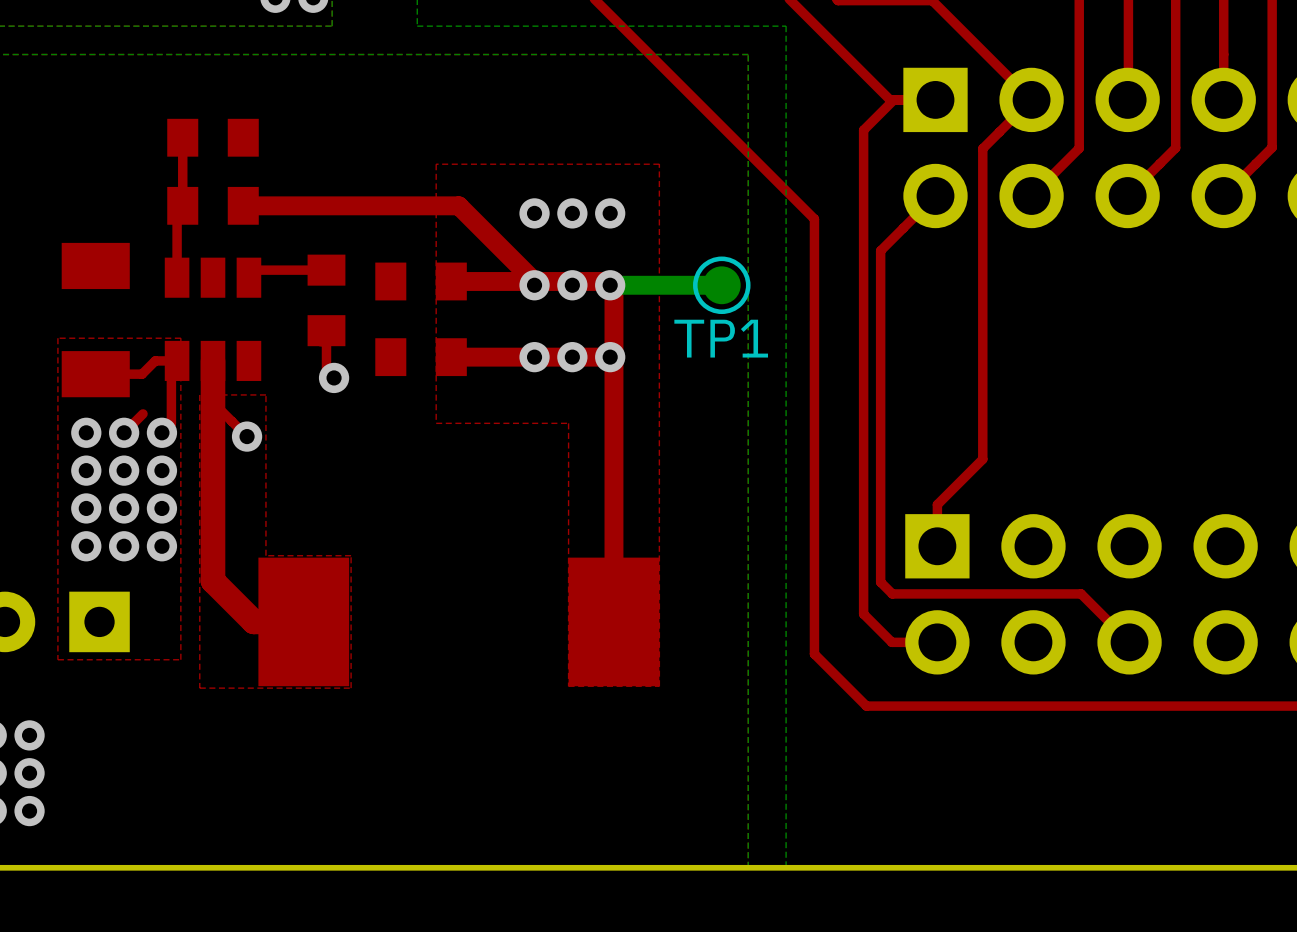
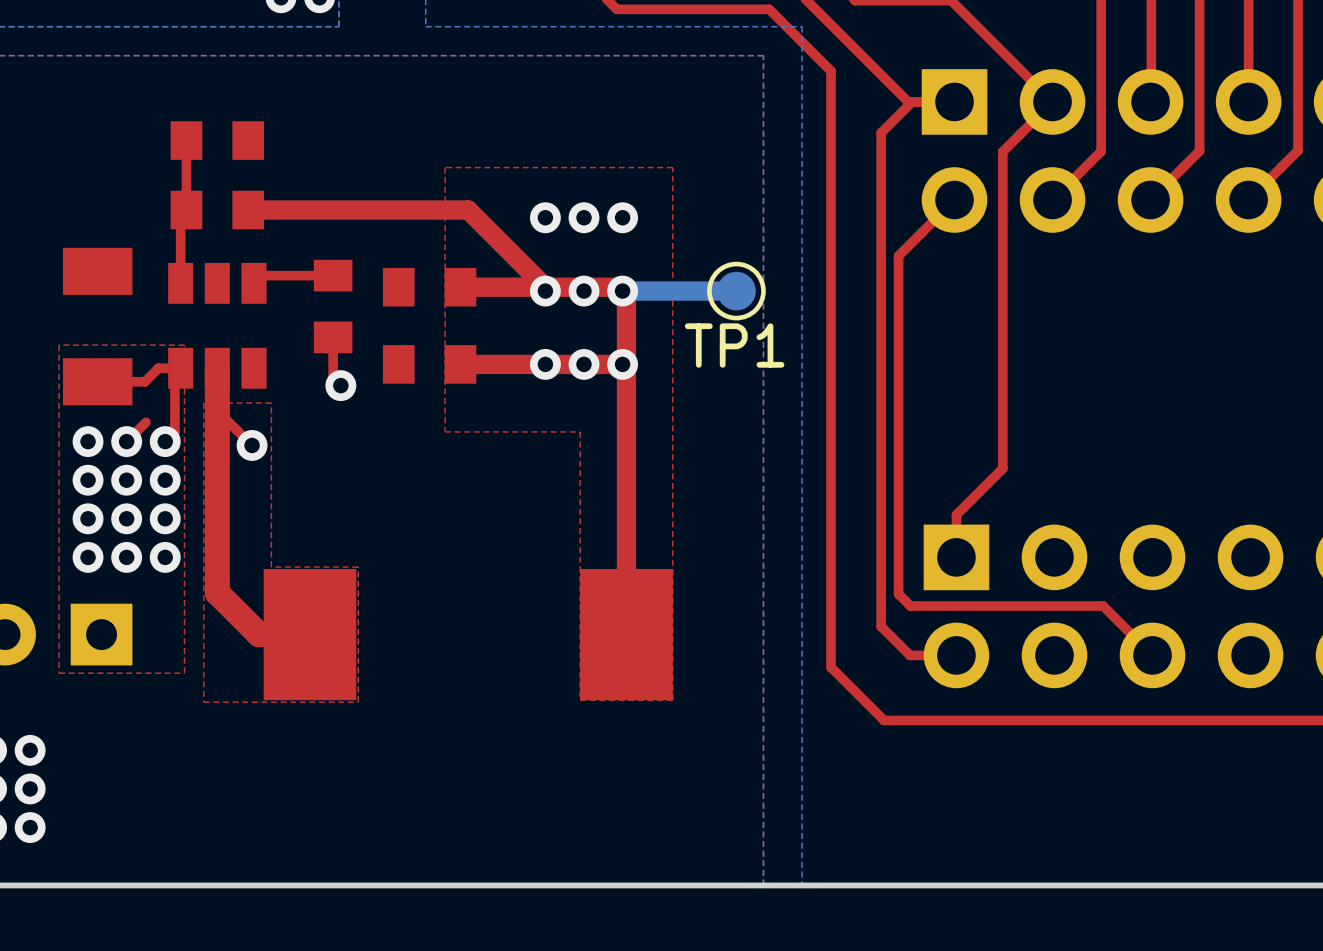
top track: (604, 9) (814, 219) -> (616, 9) (769, 9) (831, 71) (831, 223)

